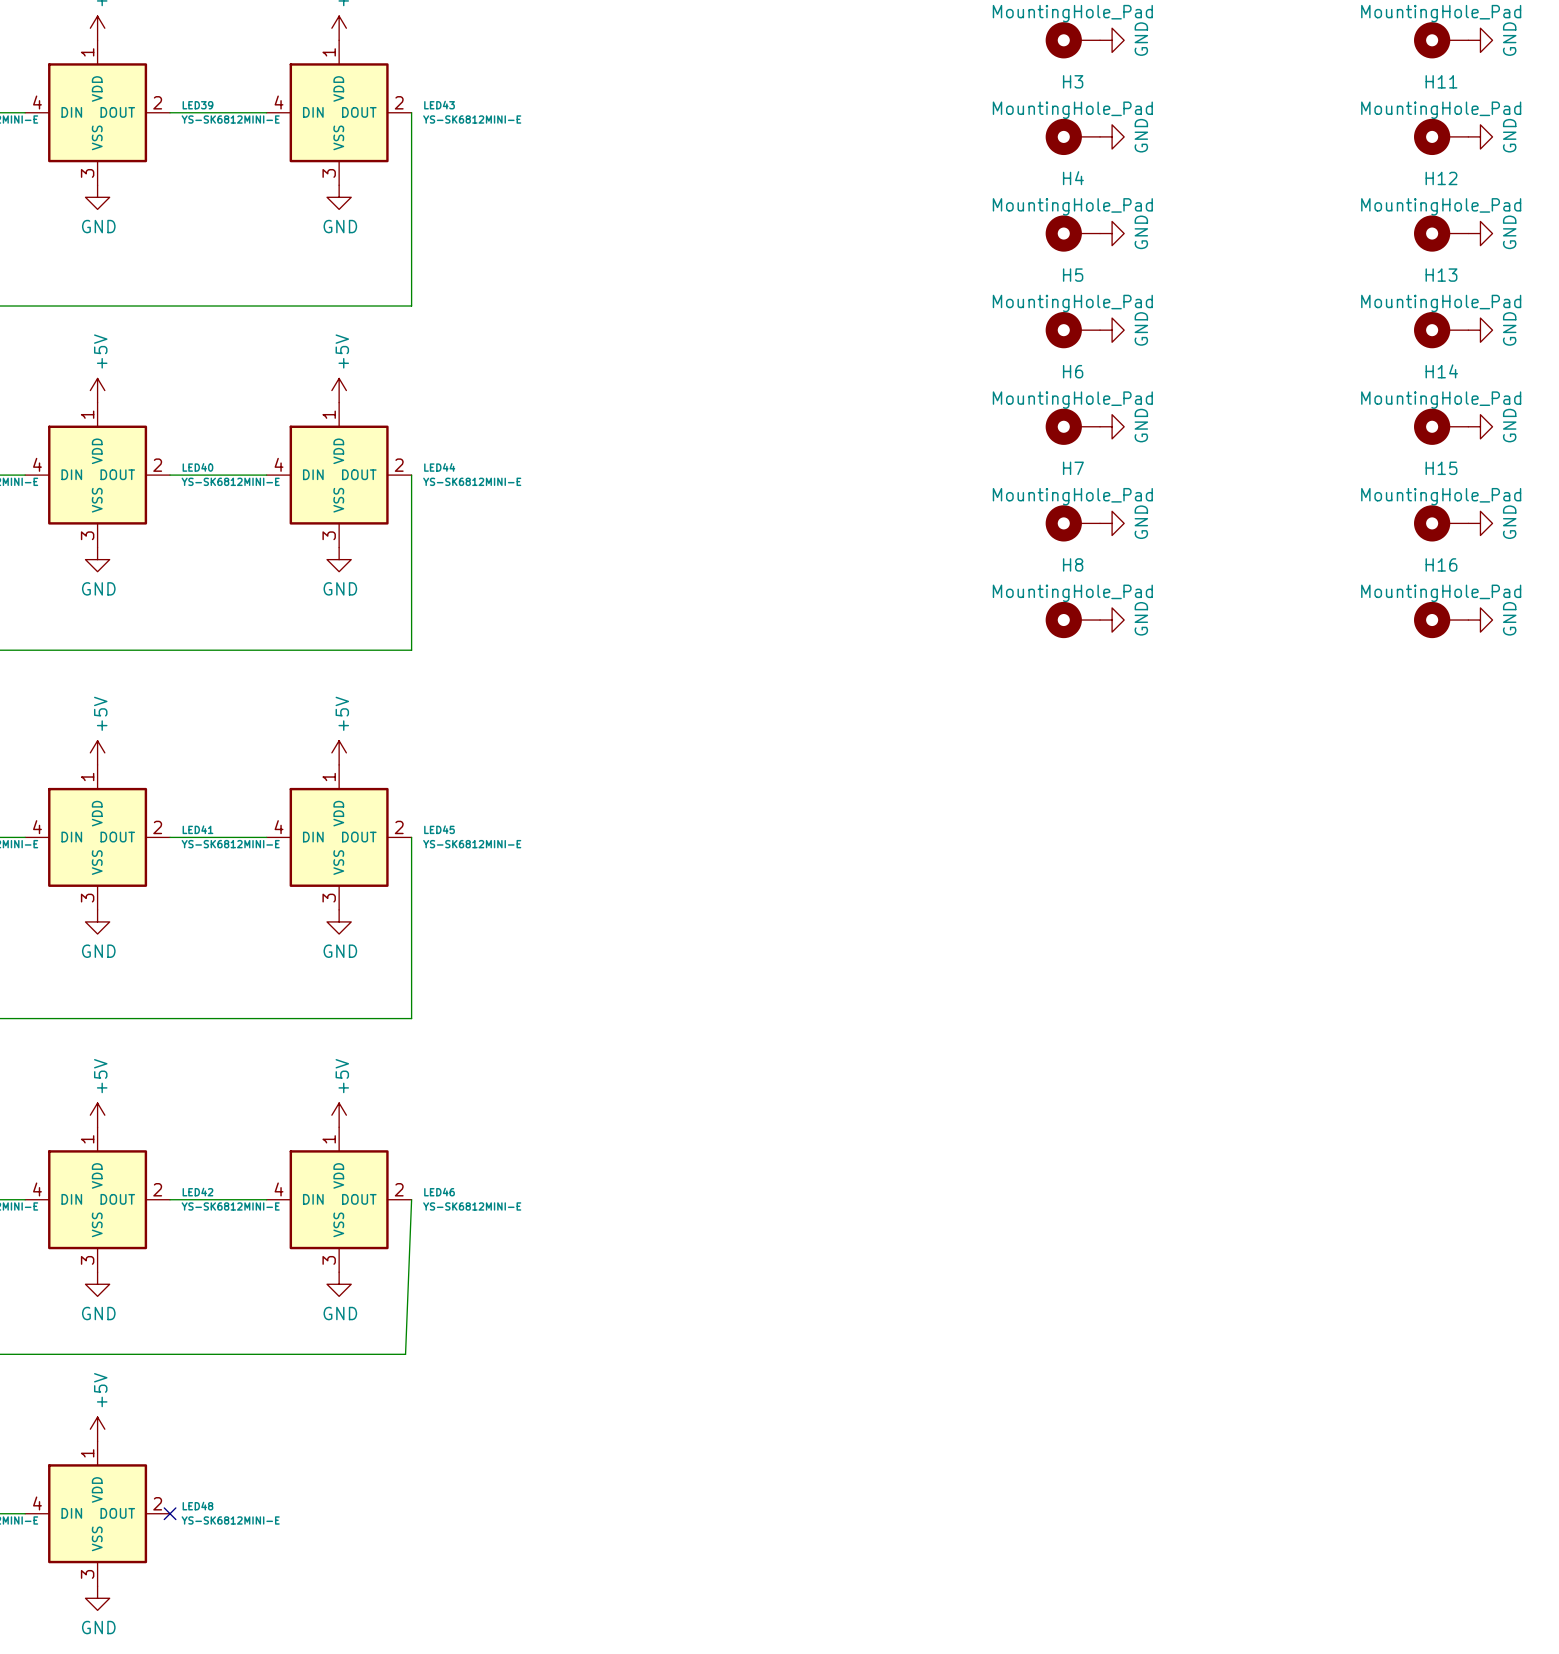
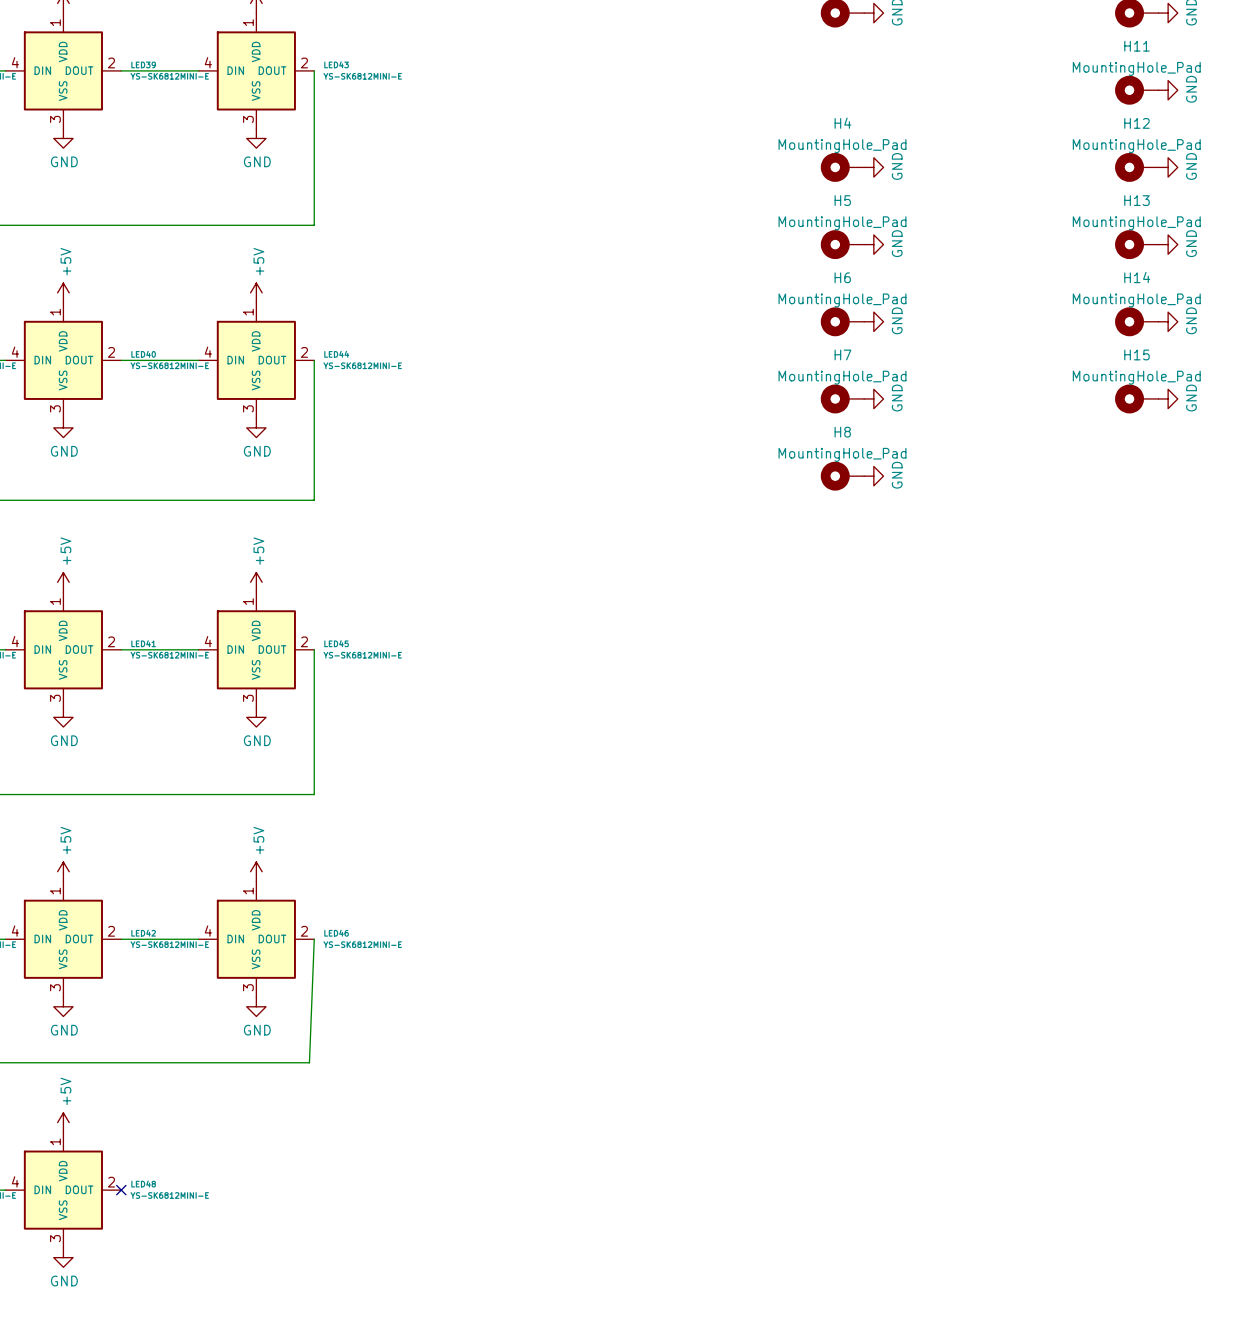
H3: MountingHole_Pad (1072, 136) -> none
power symbol: GND (1112, 136) -> none
H16: MountingHole_Pad (1441, 620) -> none
power symbol: GND (1480, 620) -> none

